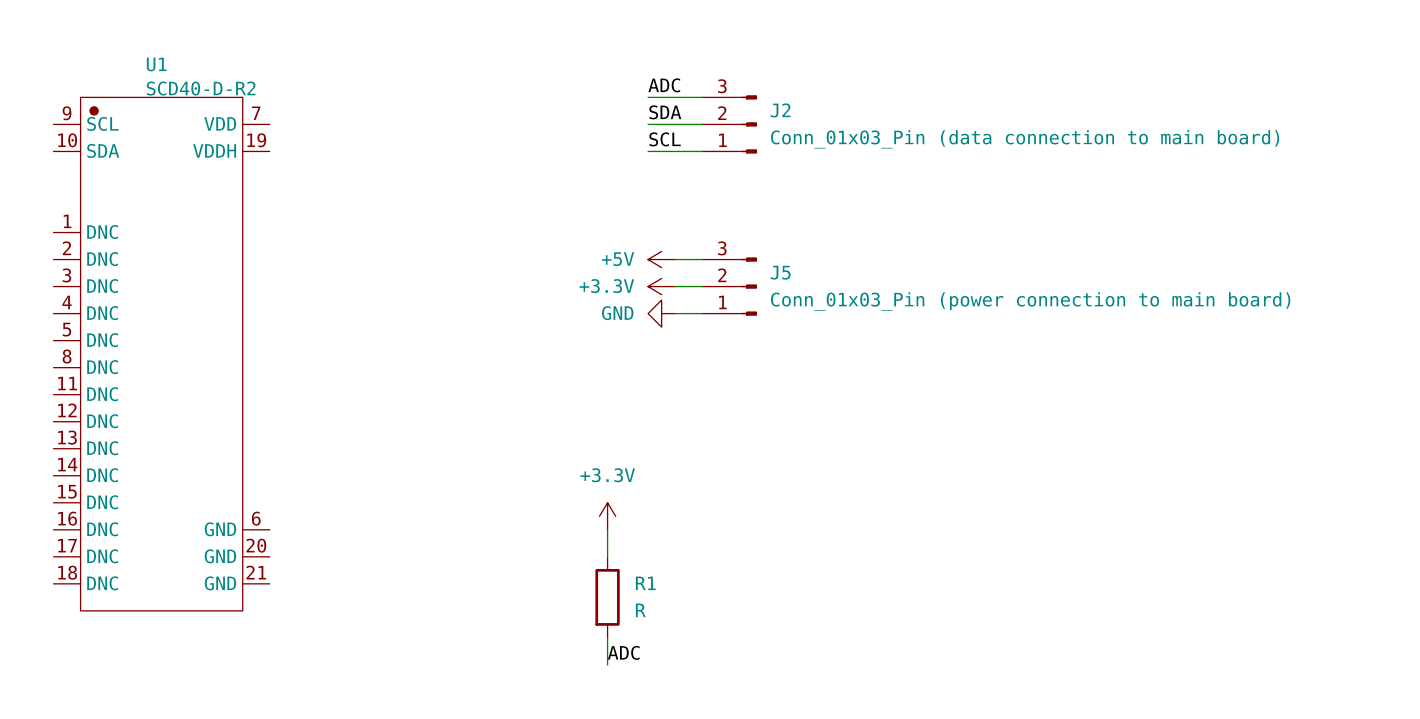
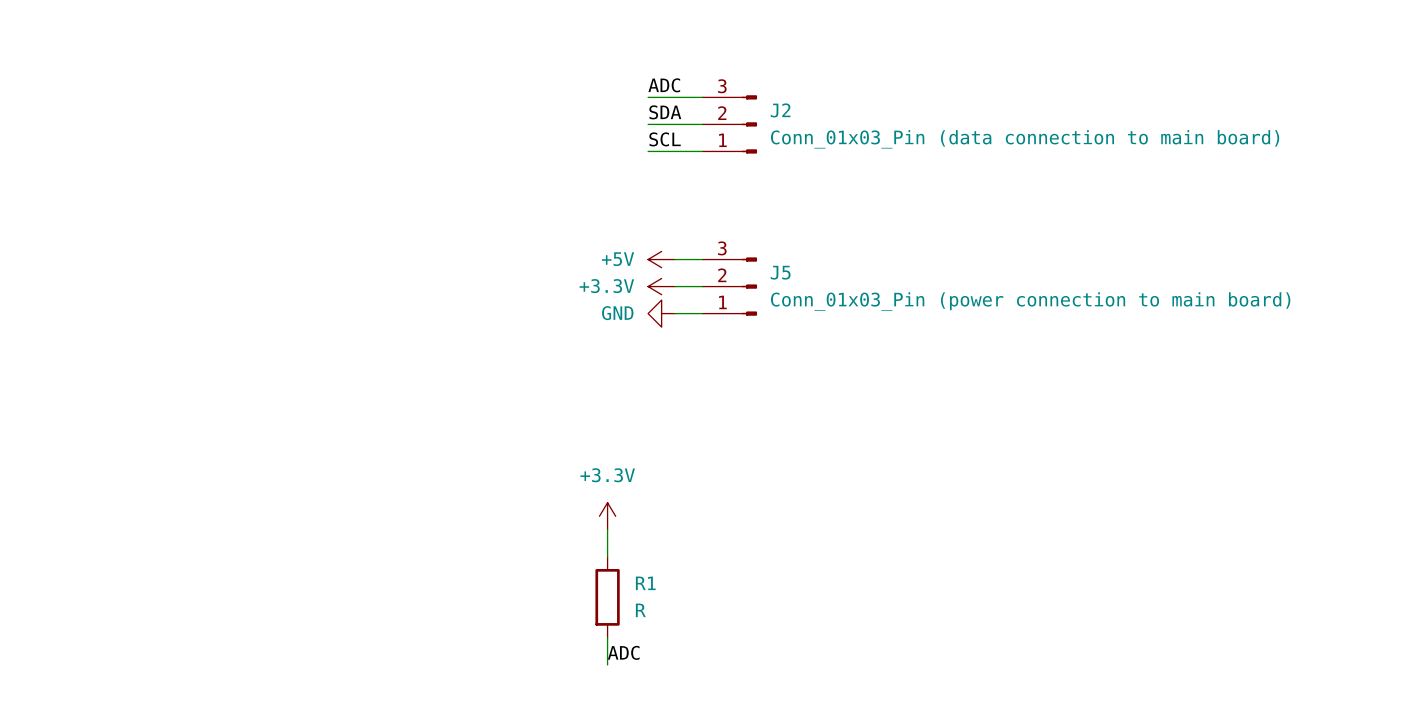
U1: SCD40-D-R2 (161, 354) -> none

